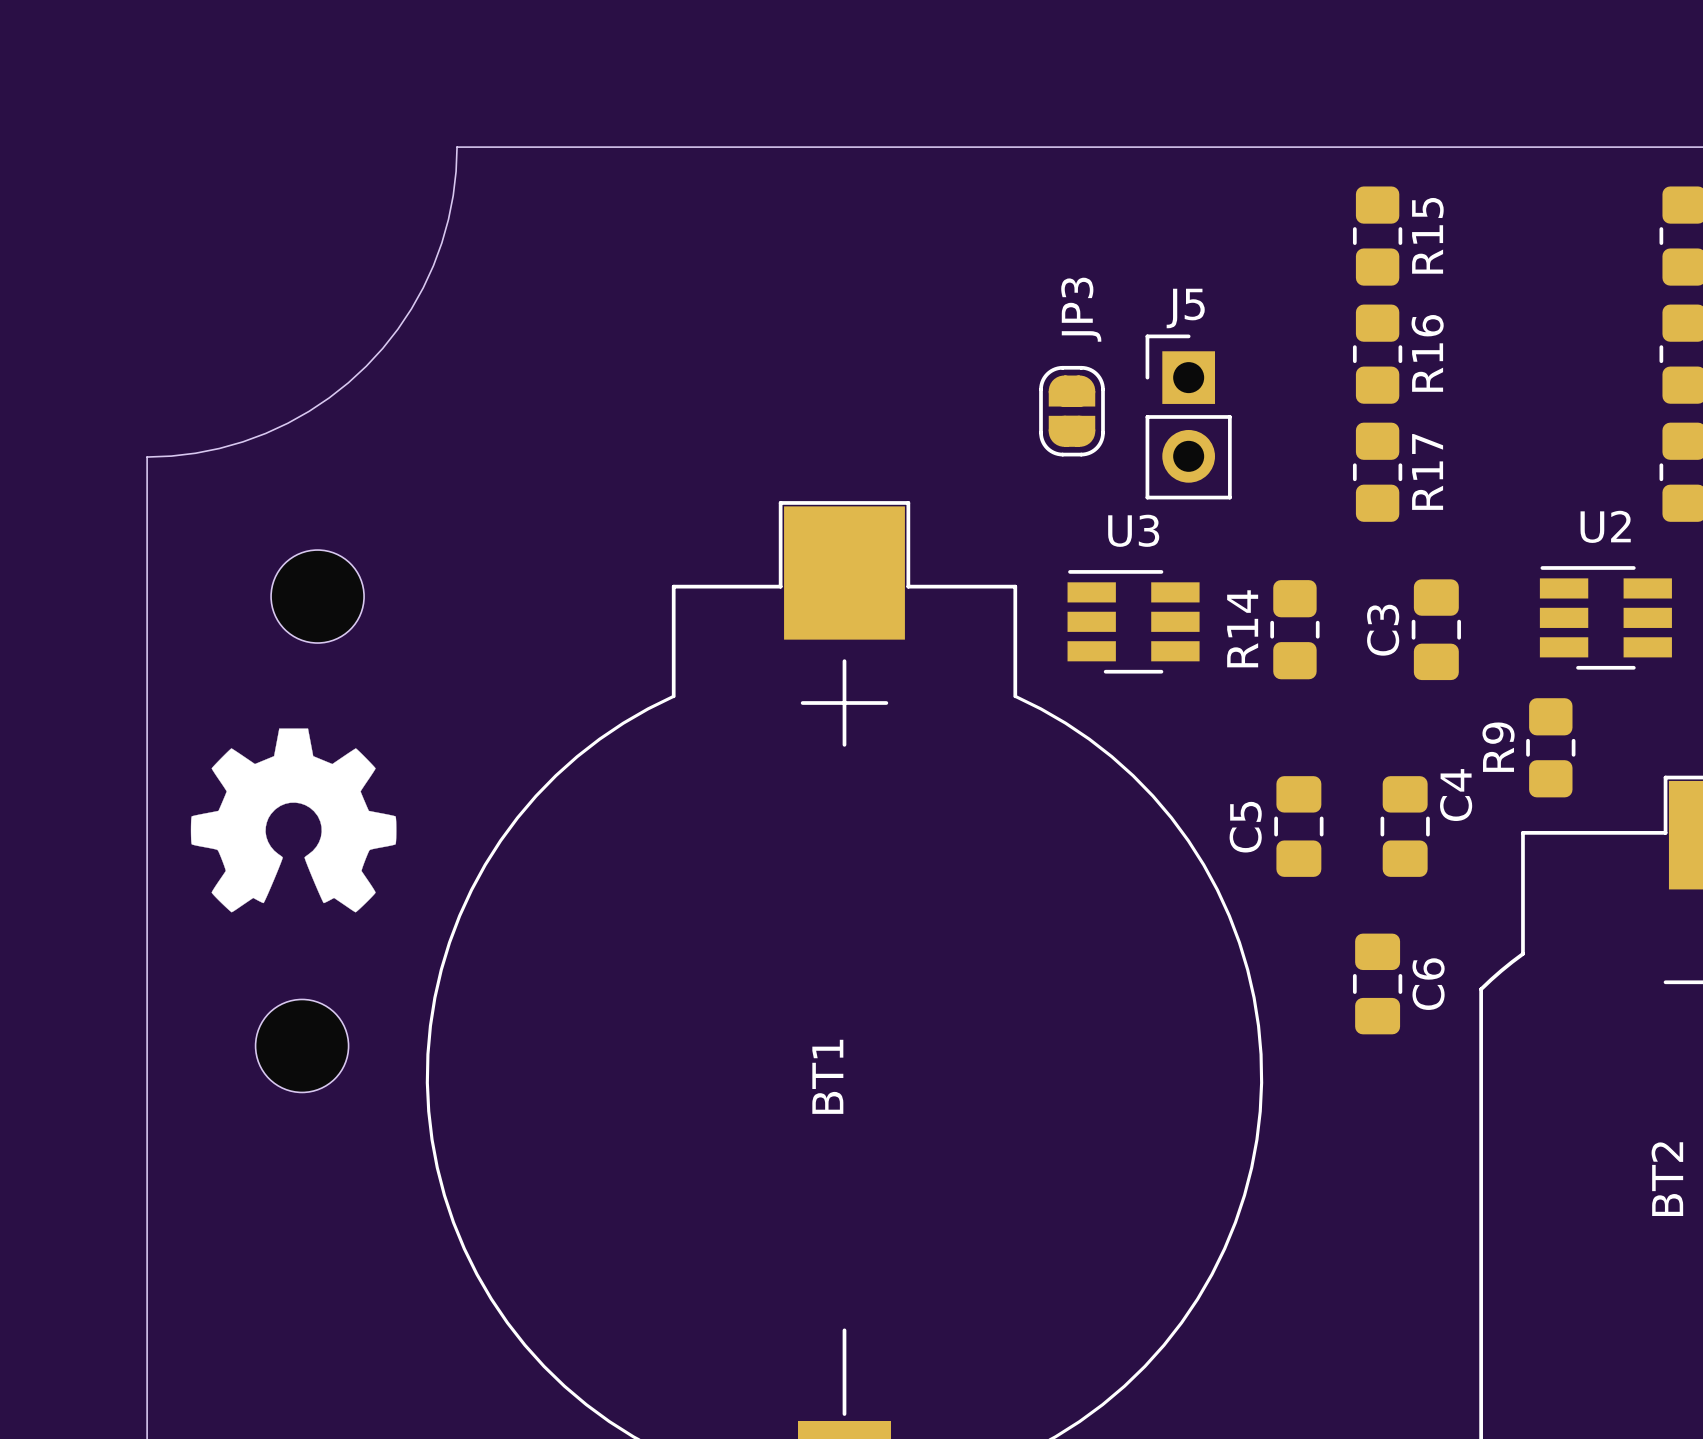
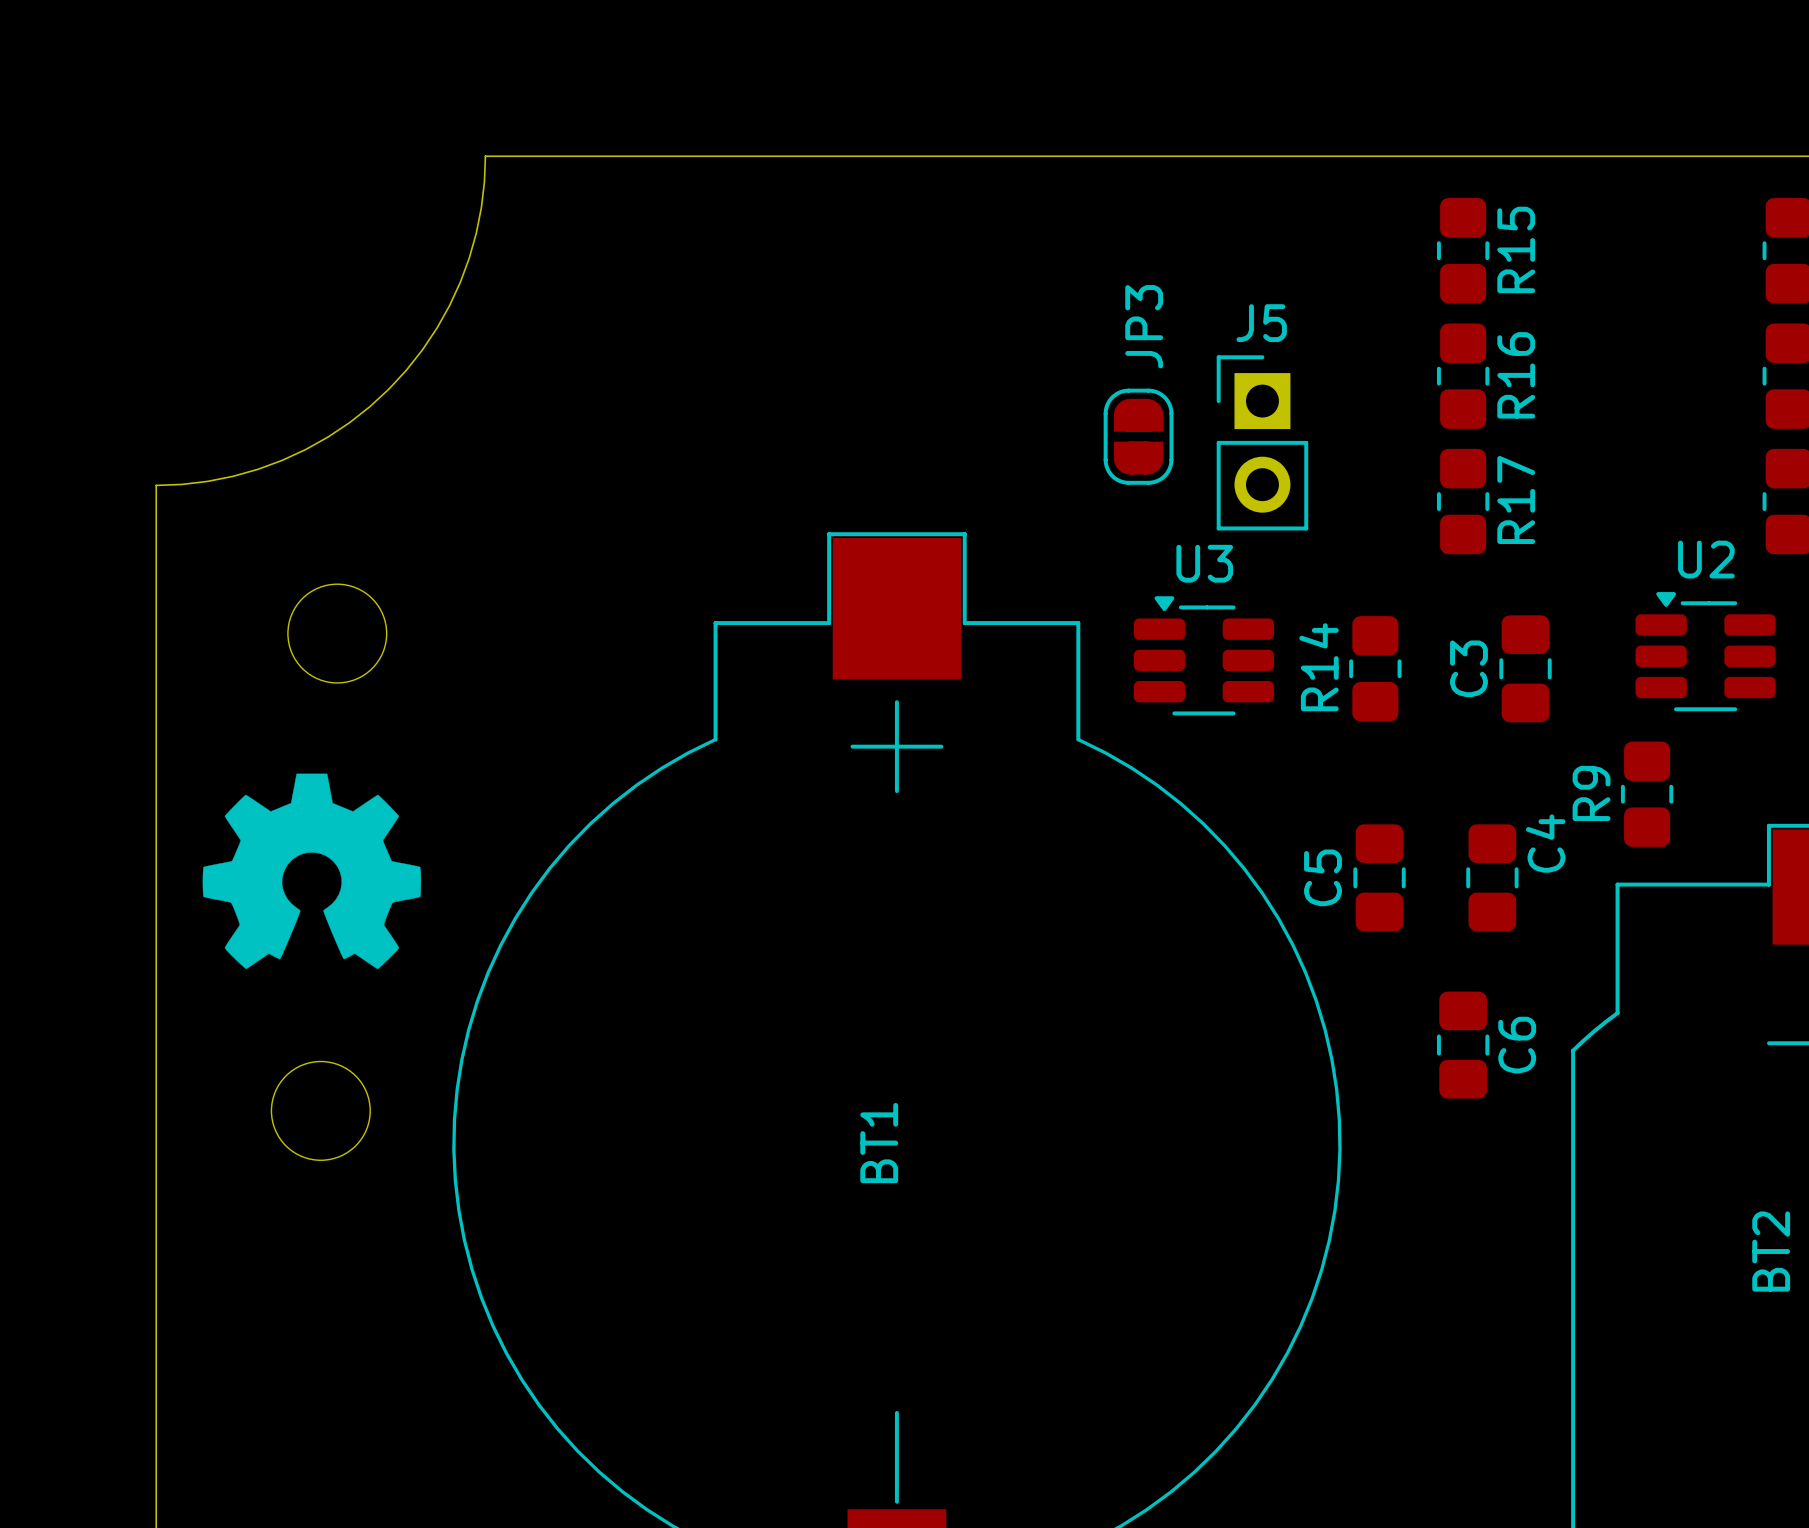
U2 footprint: [1539, 566, 1672, 670] -> [1635, 592, 1776, 712]
U3 footprint: [1067, 570, 1200, 674] -> [1133, 596, 1275, 716]

